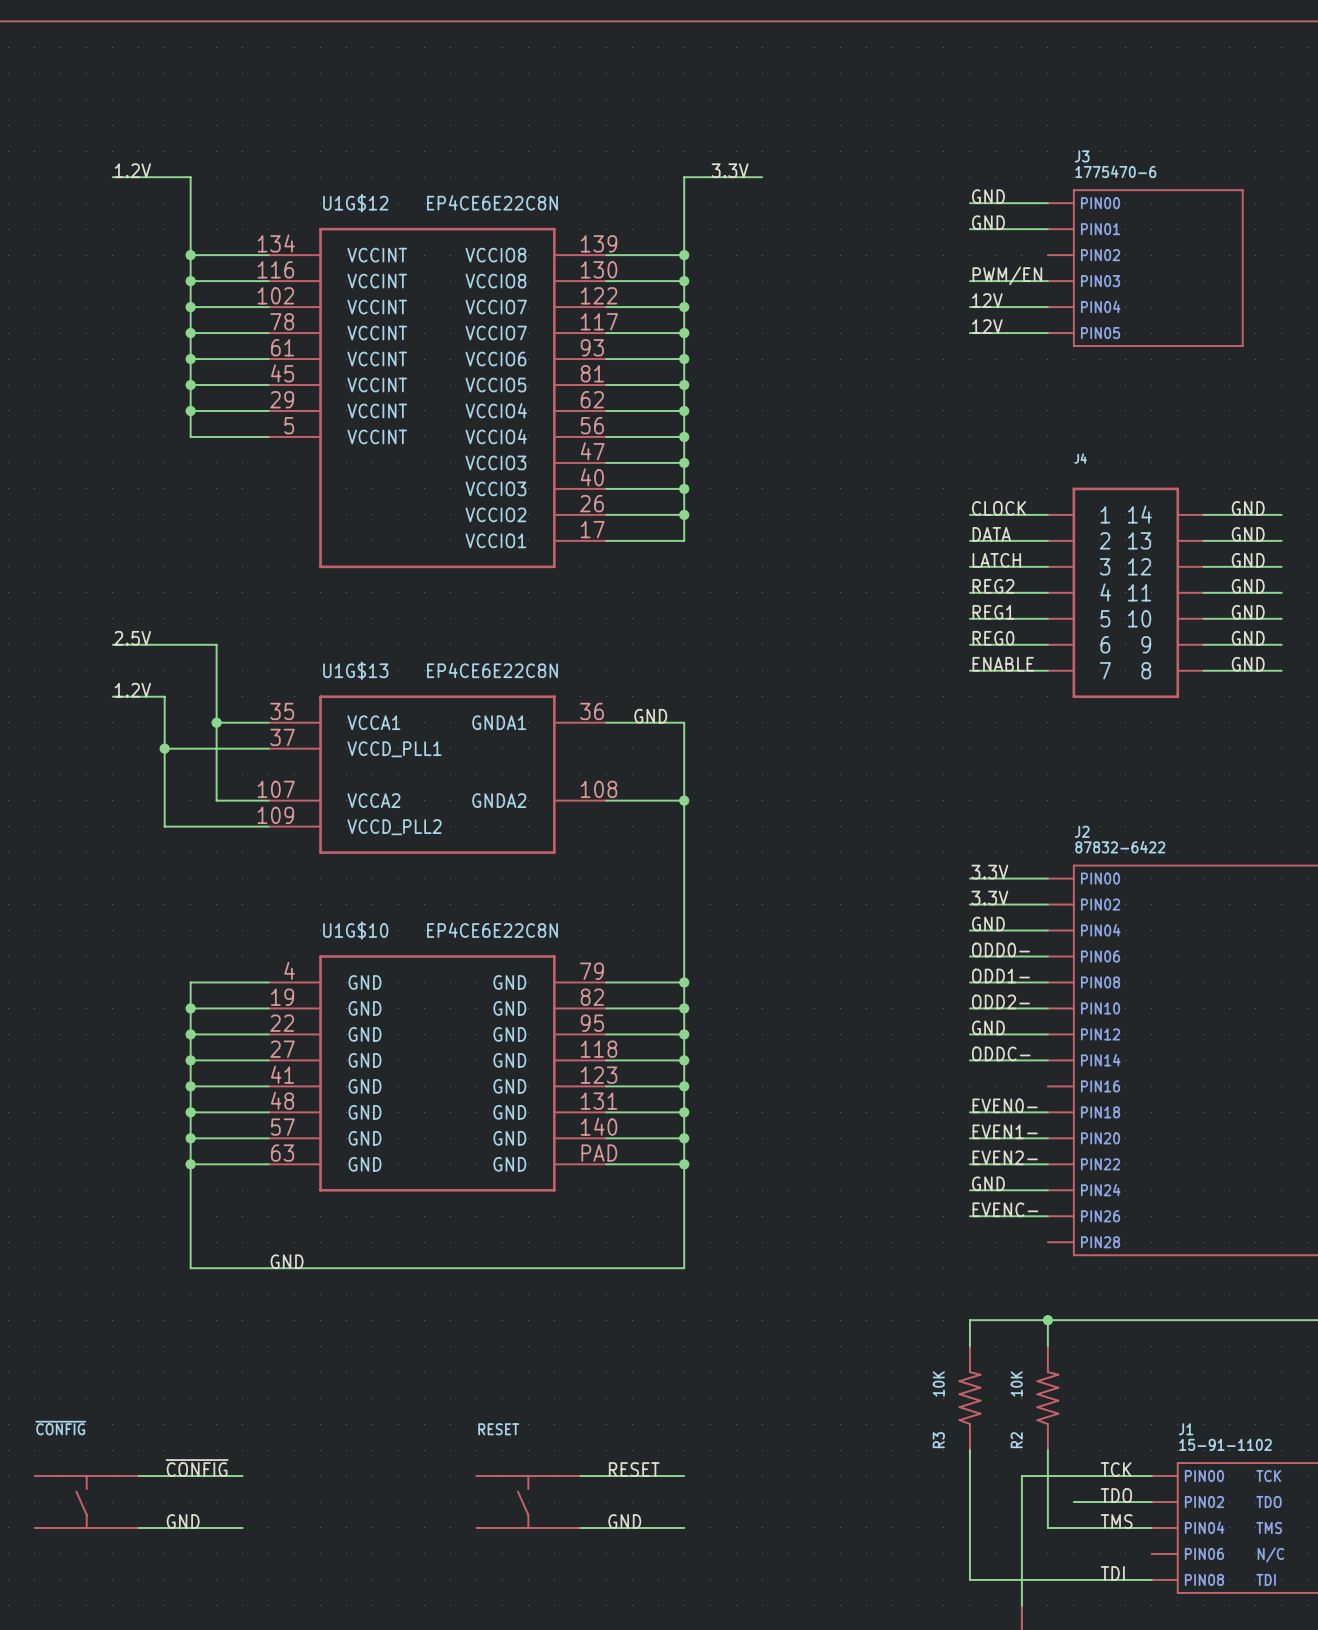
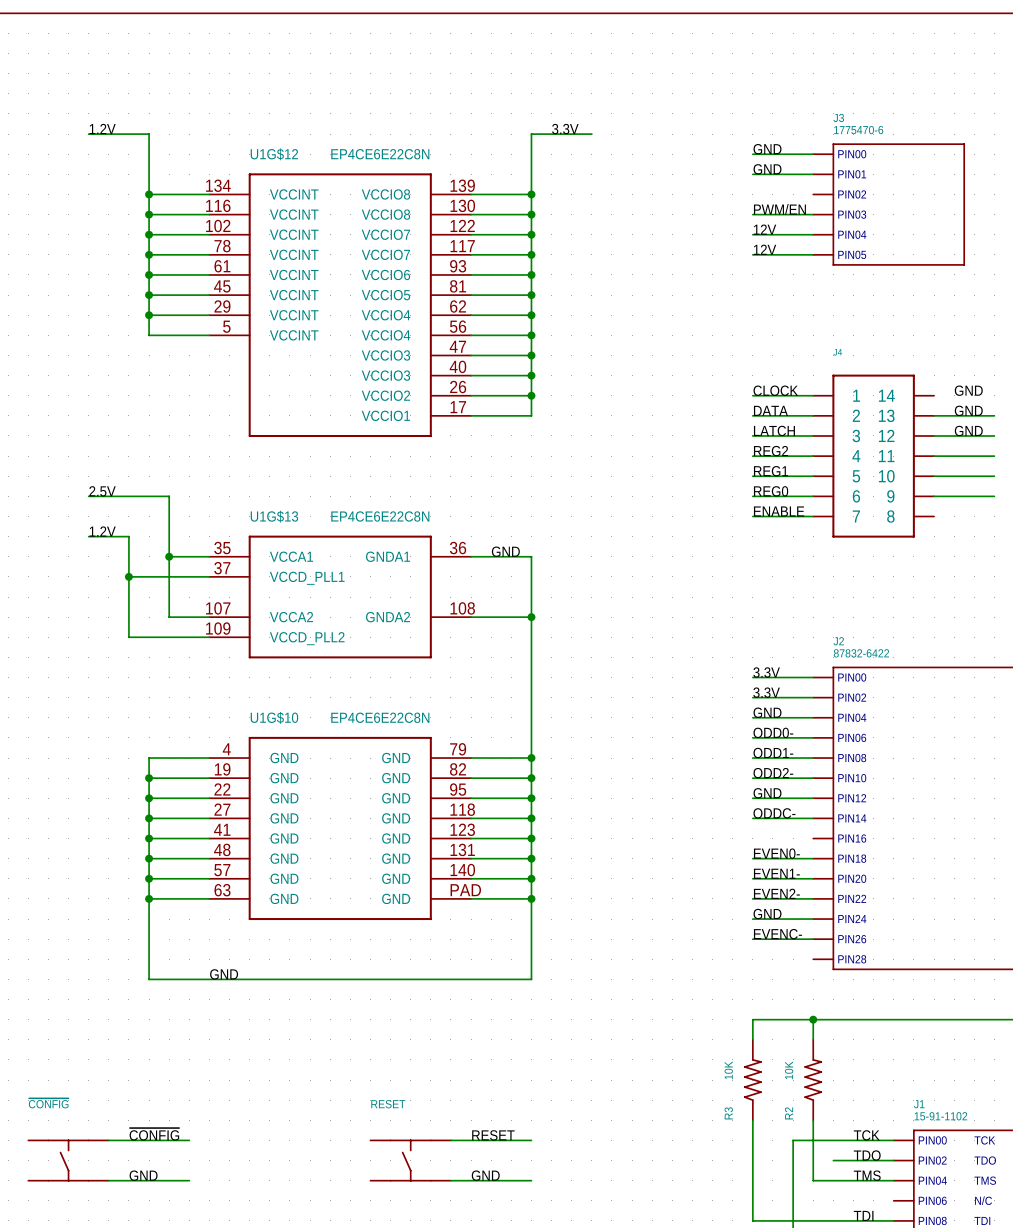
wire: (1203, 514) (1281, 514) -> none
label: GND (1248, 586) -> none
label: GND (1248, 612) -> none
label: GND (1248, 638) -> none
label: GND (1248, 664) -> none
wire: (1203, 670) (1281, 670) -> none

